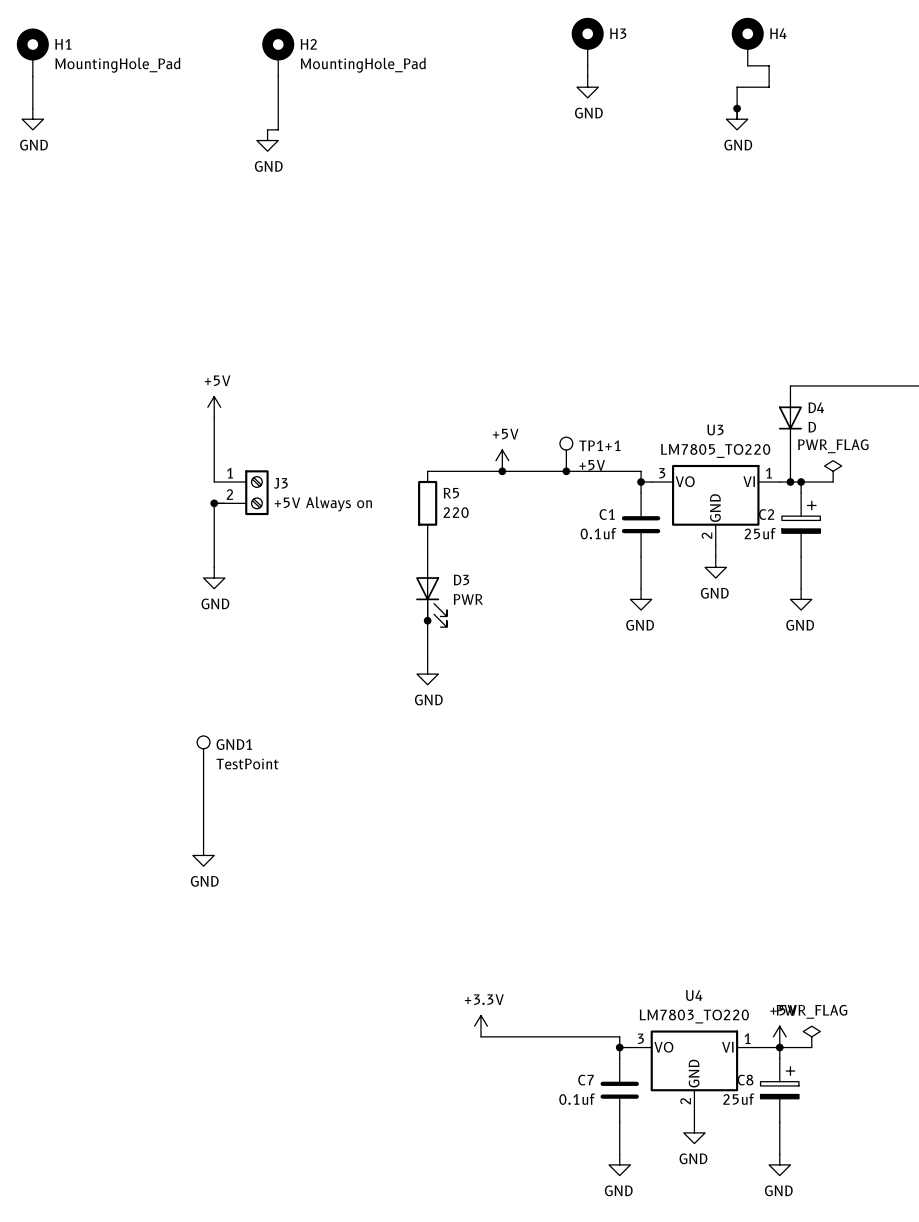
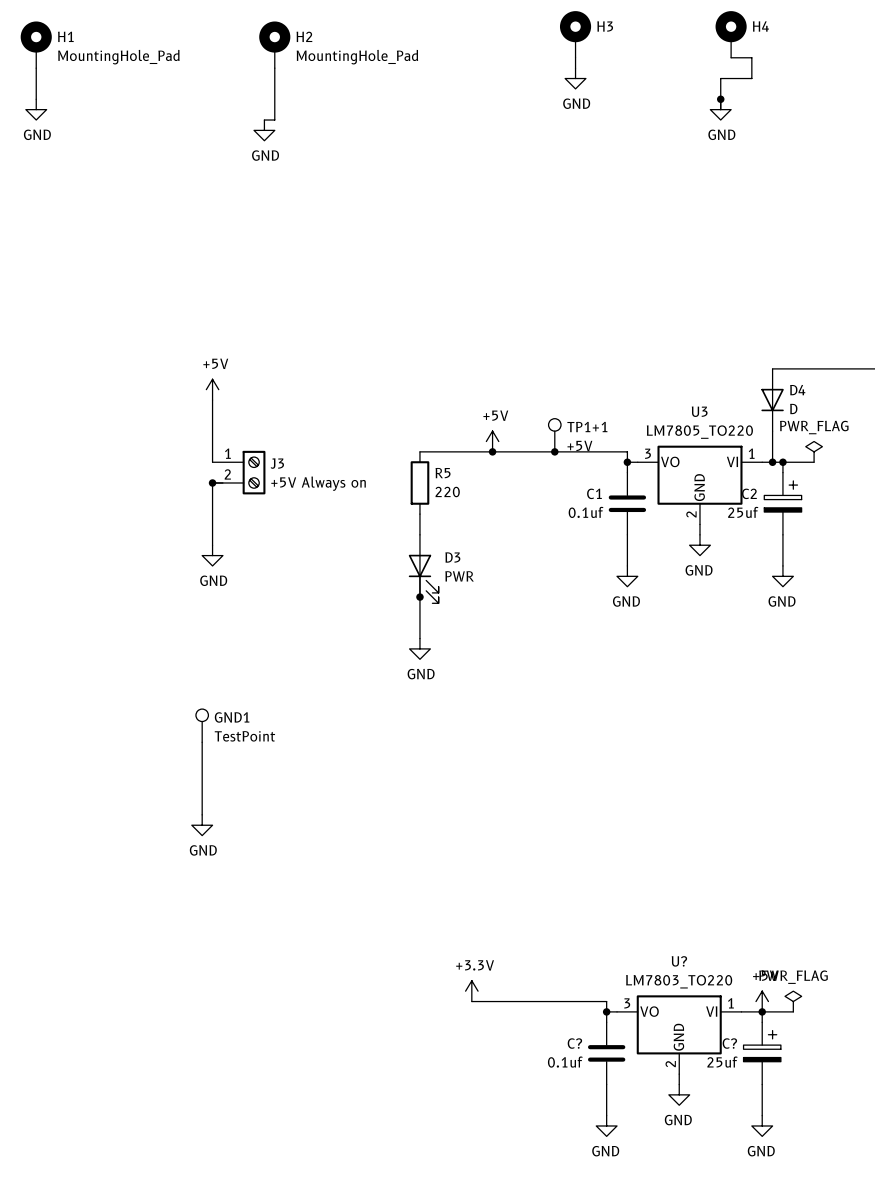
U4 name: U4 (694, 995) -> U? (679, 961)
C7 name: C7 (586, 1080) -> C? (574, 1043)
C8 name: C8 (745, 1080) -> C? (729, 1043)

